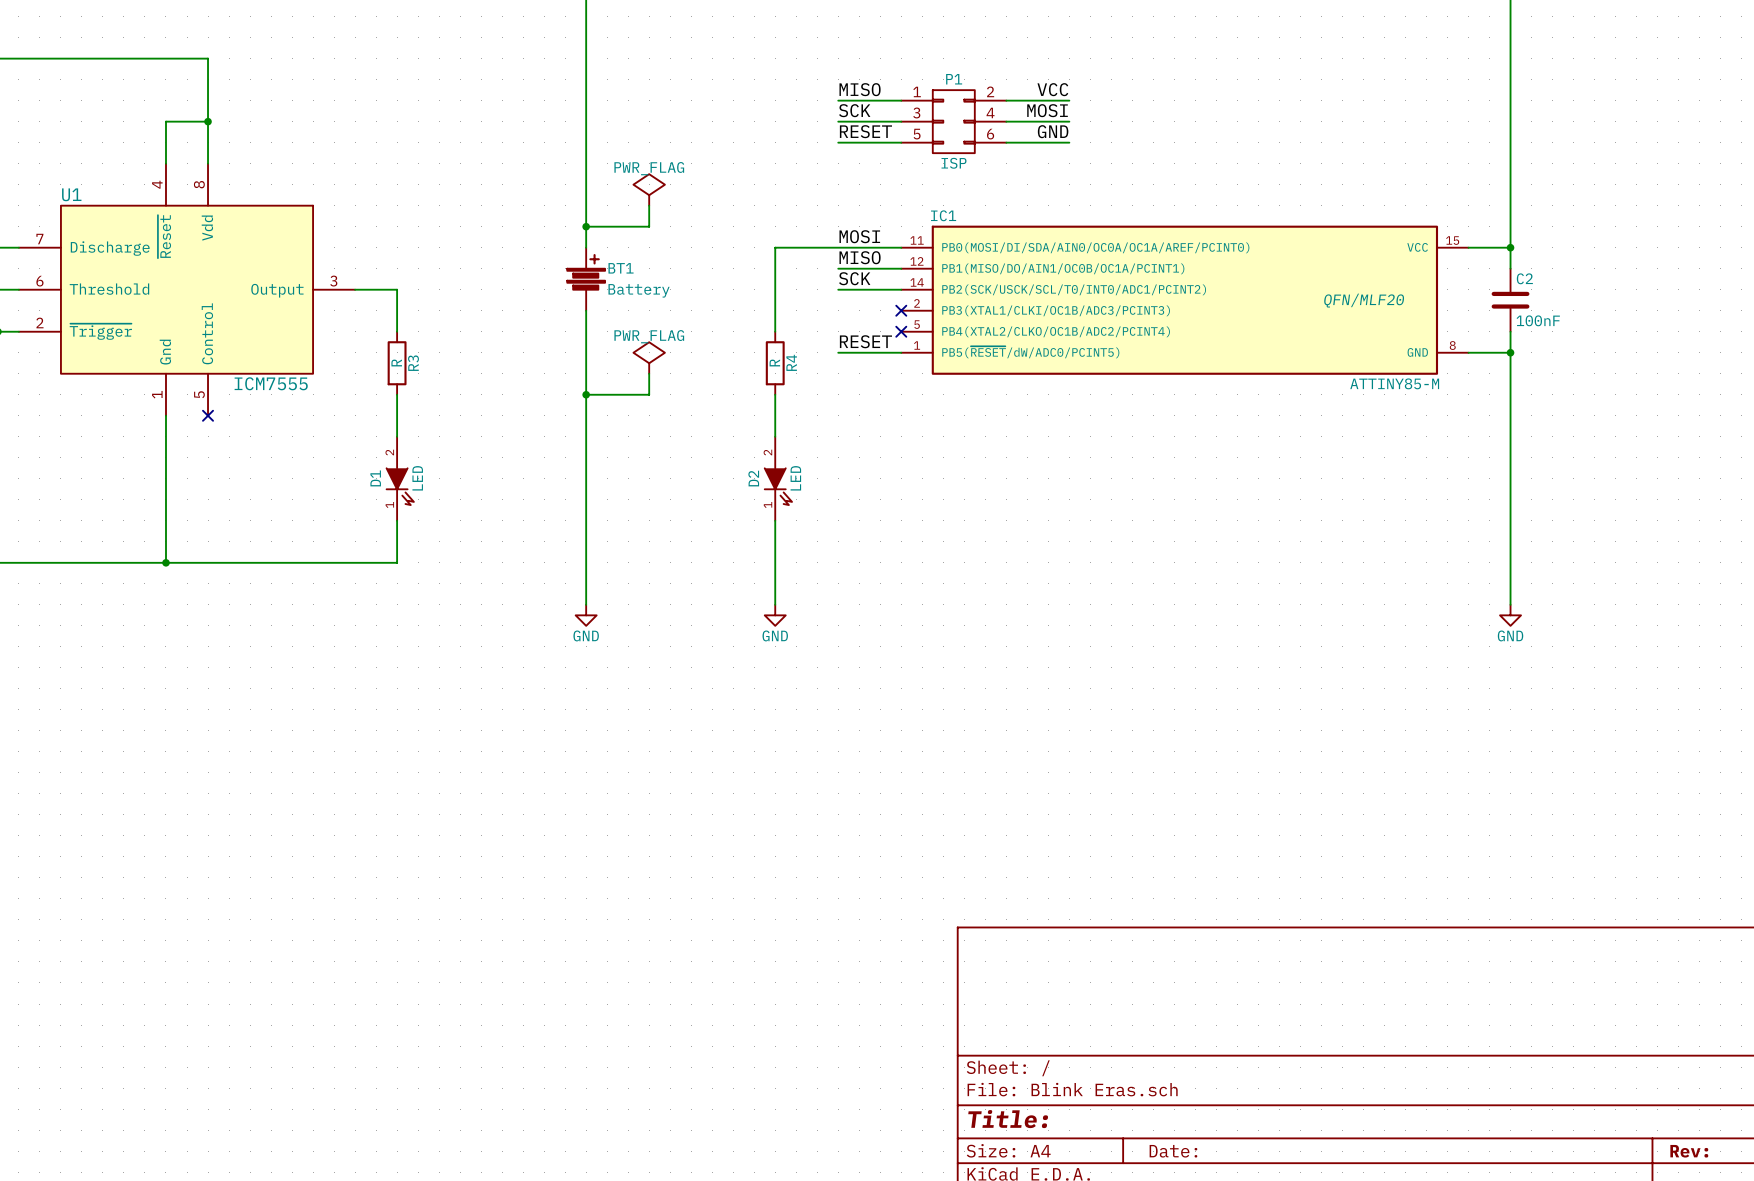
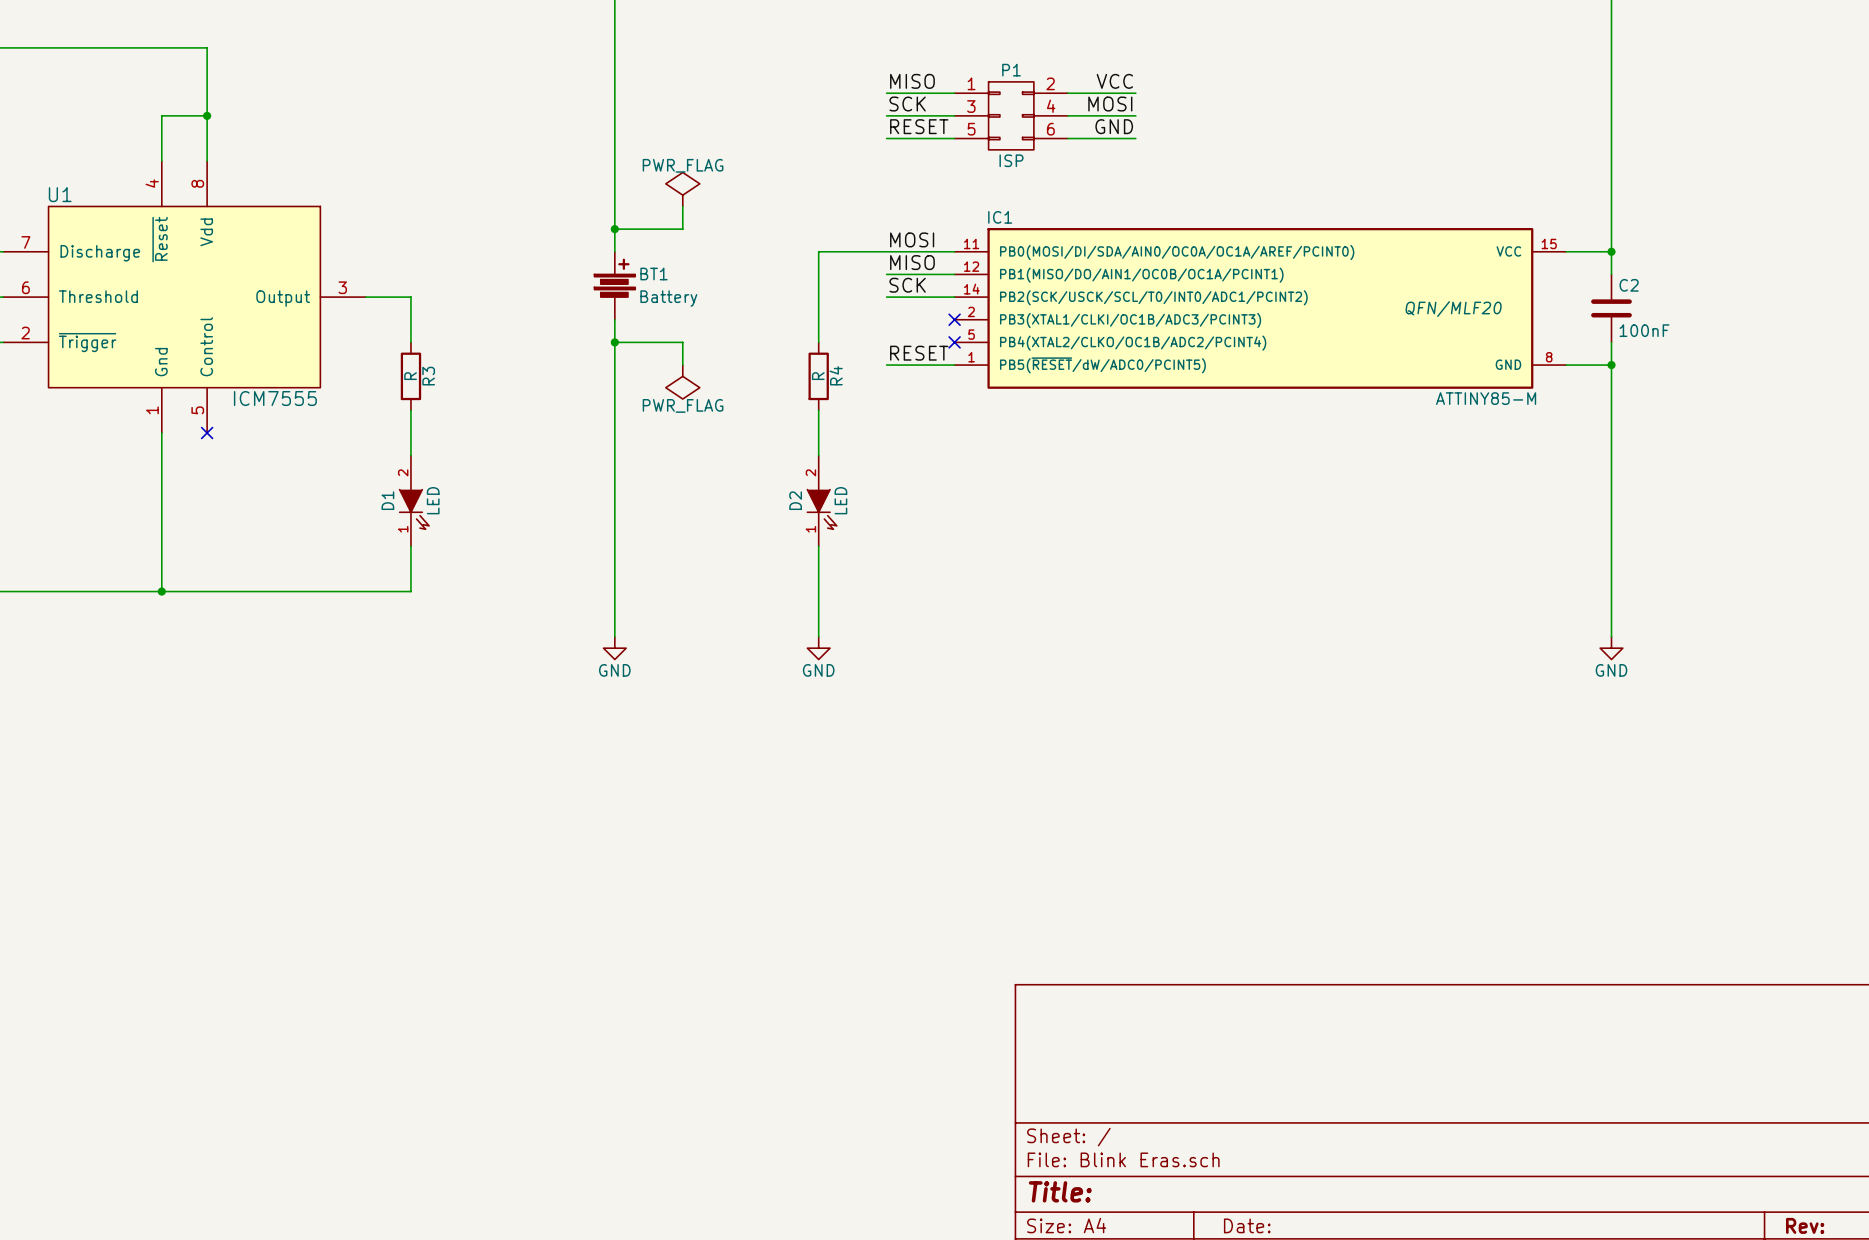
wire: none -> (614, 342) (682, 342) (682, 365)
junction: none -> (614, 342)
power symbol rotation: 0° (649, 357) -> 180° (682, 382)
wire: (649, 373) (649, 394) (586, 394) -> none
junction: (586, 394) -> none

